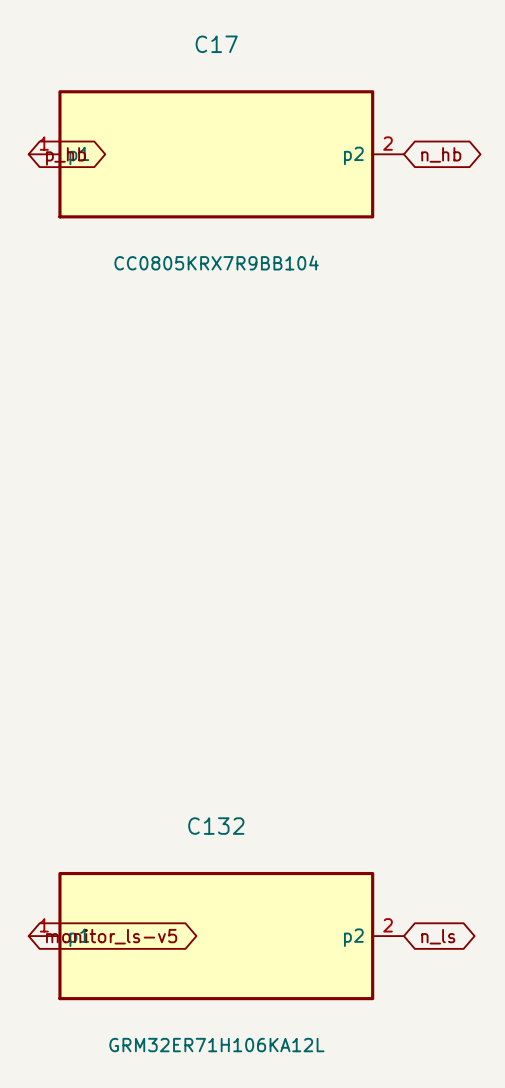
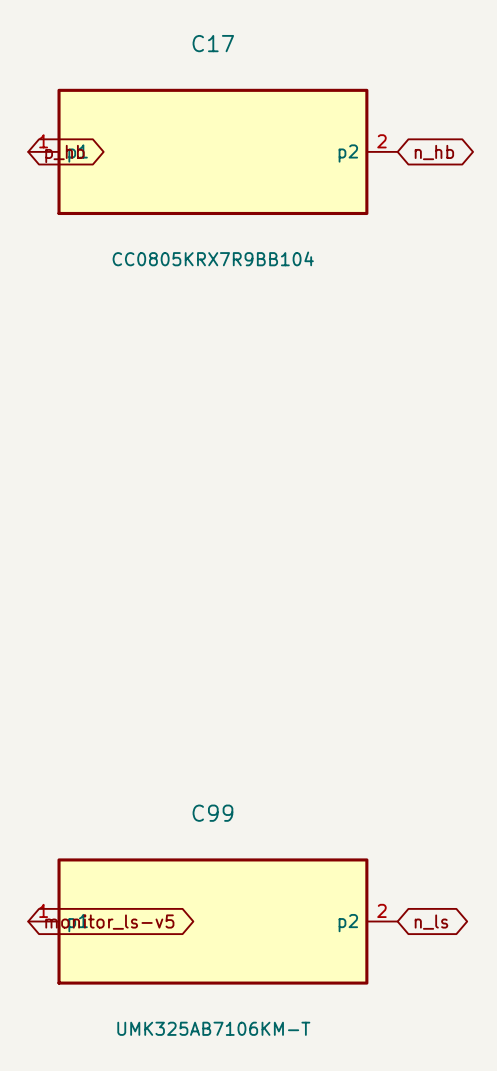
C132 name: C132 (216, 826) -> C99 (212, 813)
C132 value: GRM32ER71H106KA12L (216, 1045) -> UMK325AB7106KM-T (213, 1028)

